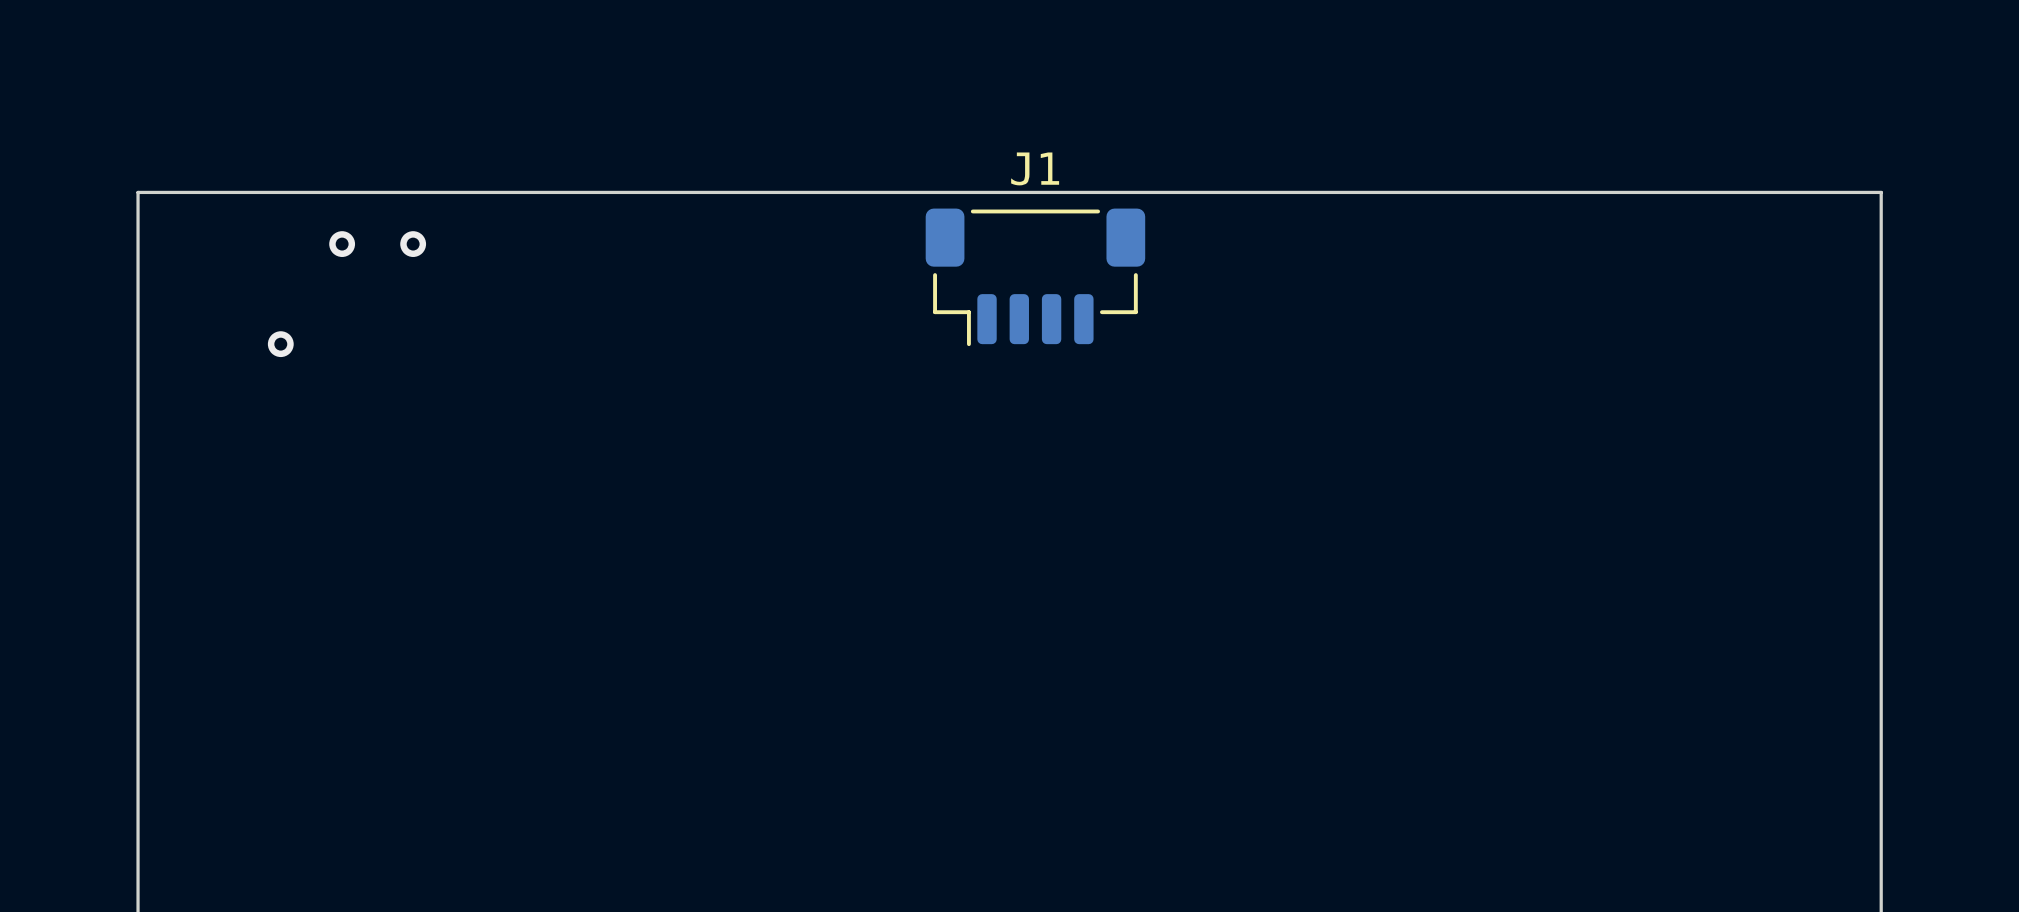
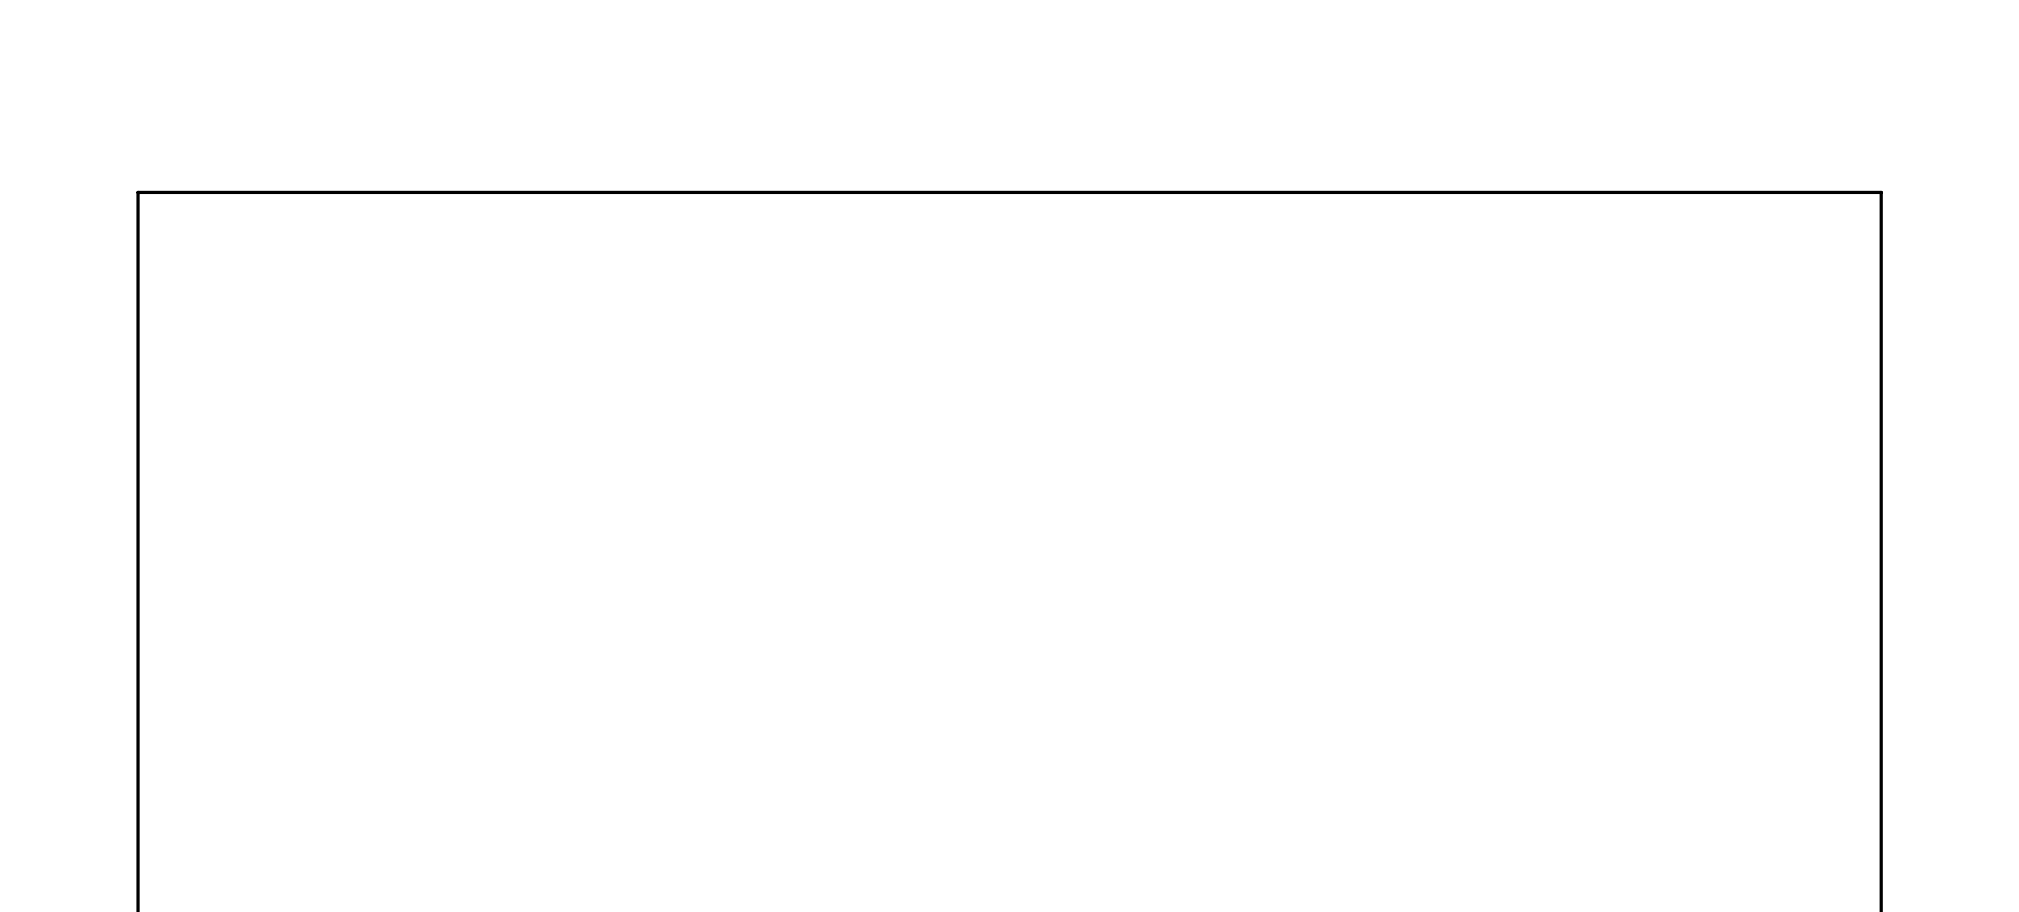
via: (342, 244) -> none
via: (413, 244) -> none
J1: (1035, 277) -> none
via: (280, 344) -> none

